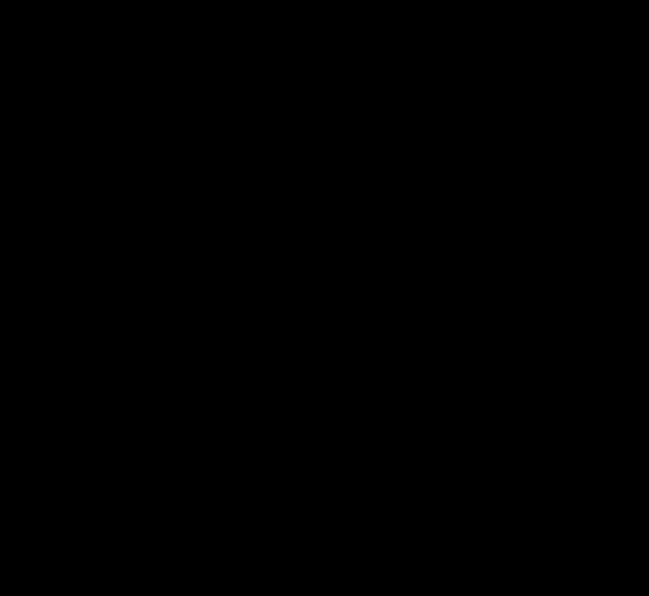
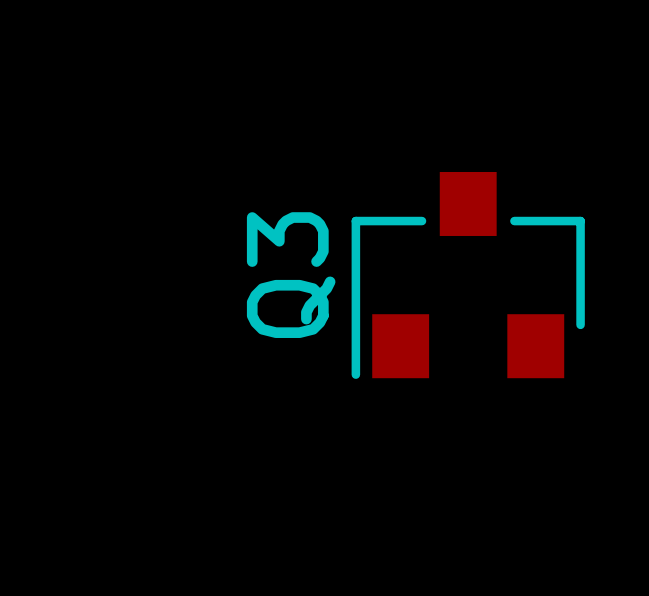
Q3: none -> (468, 275)

